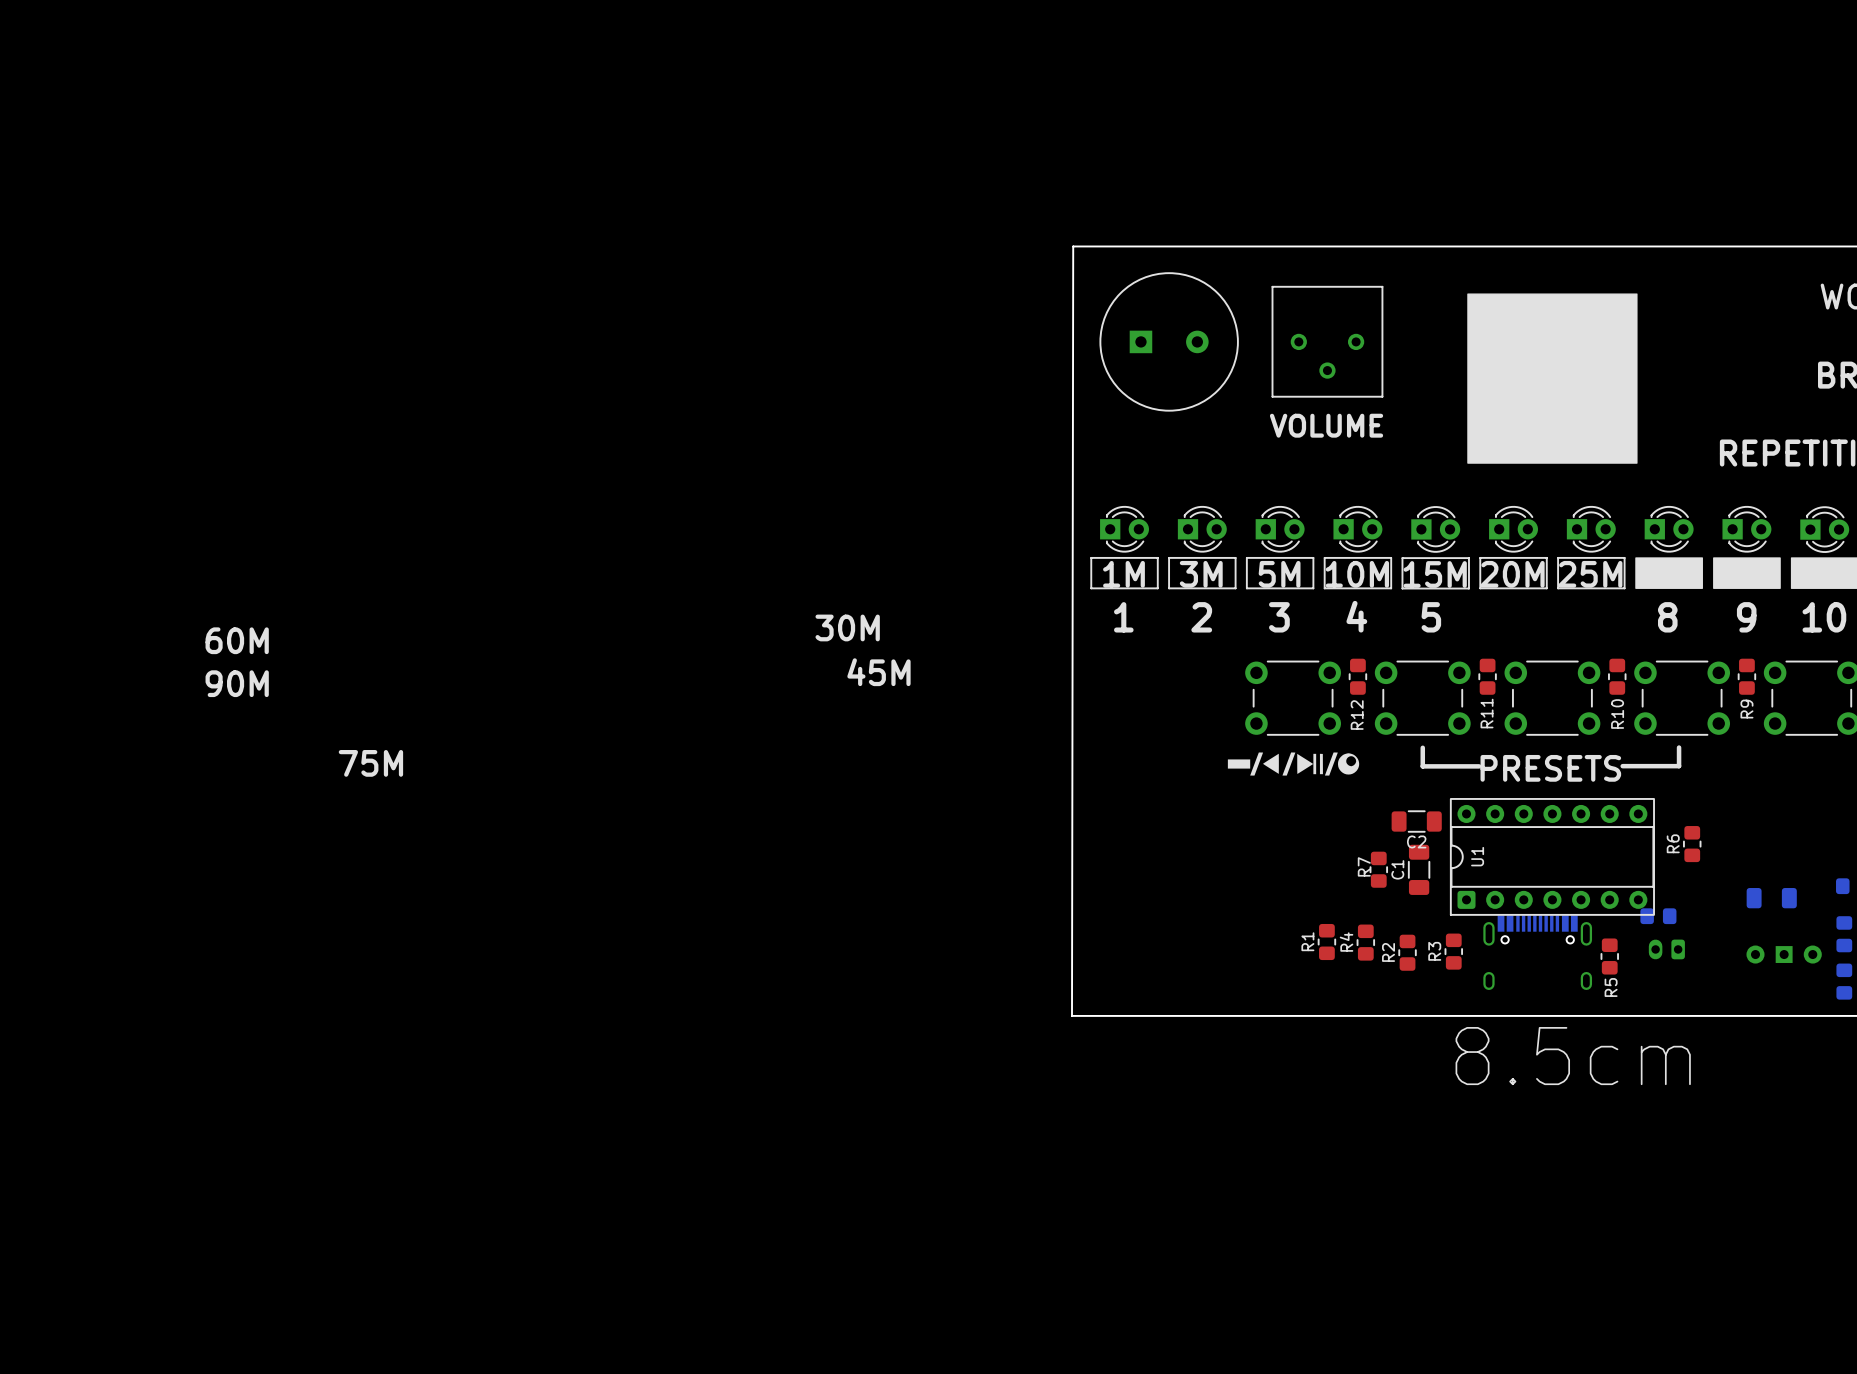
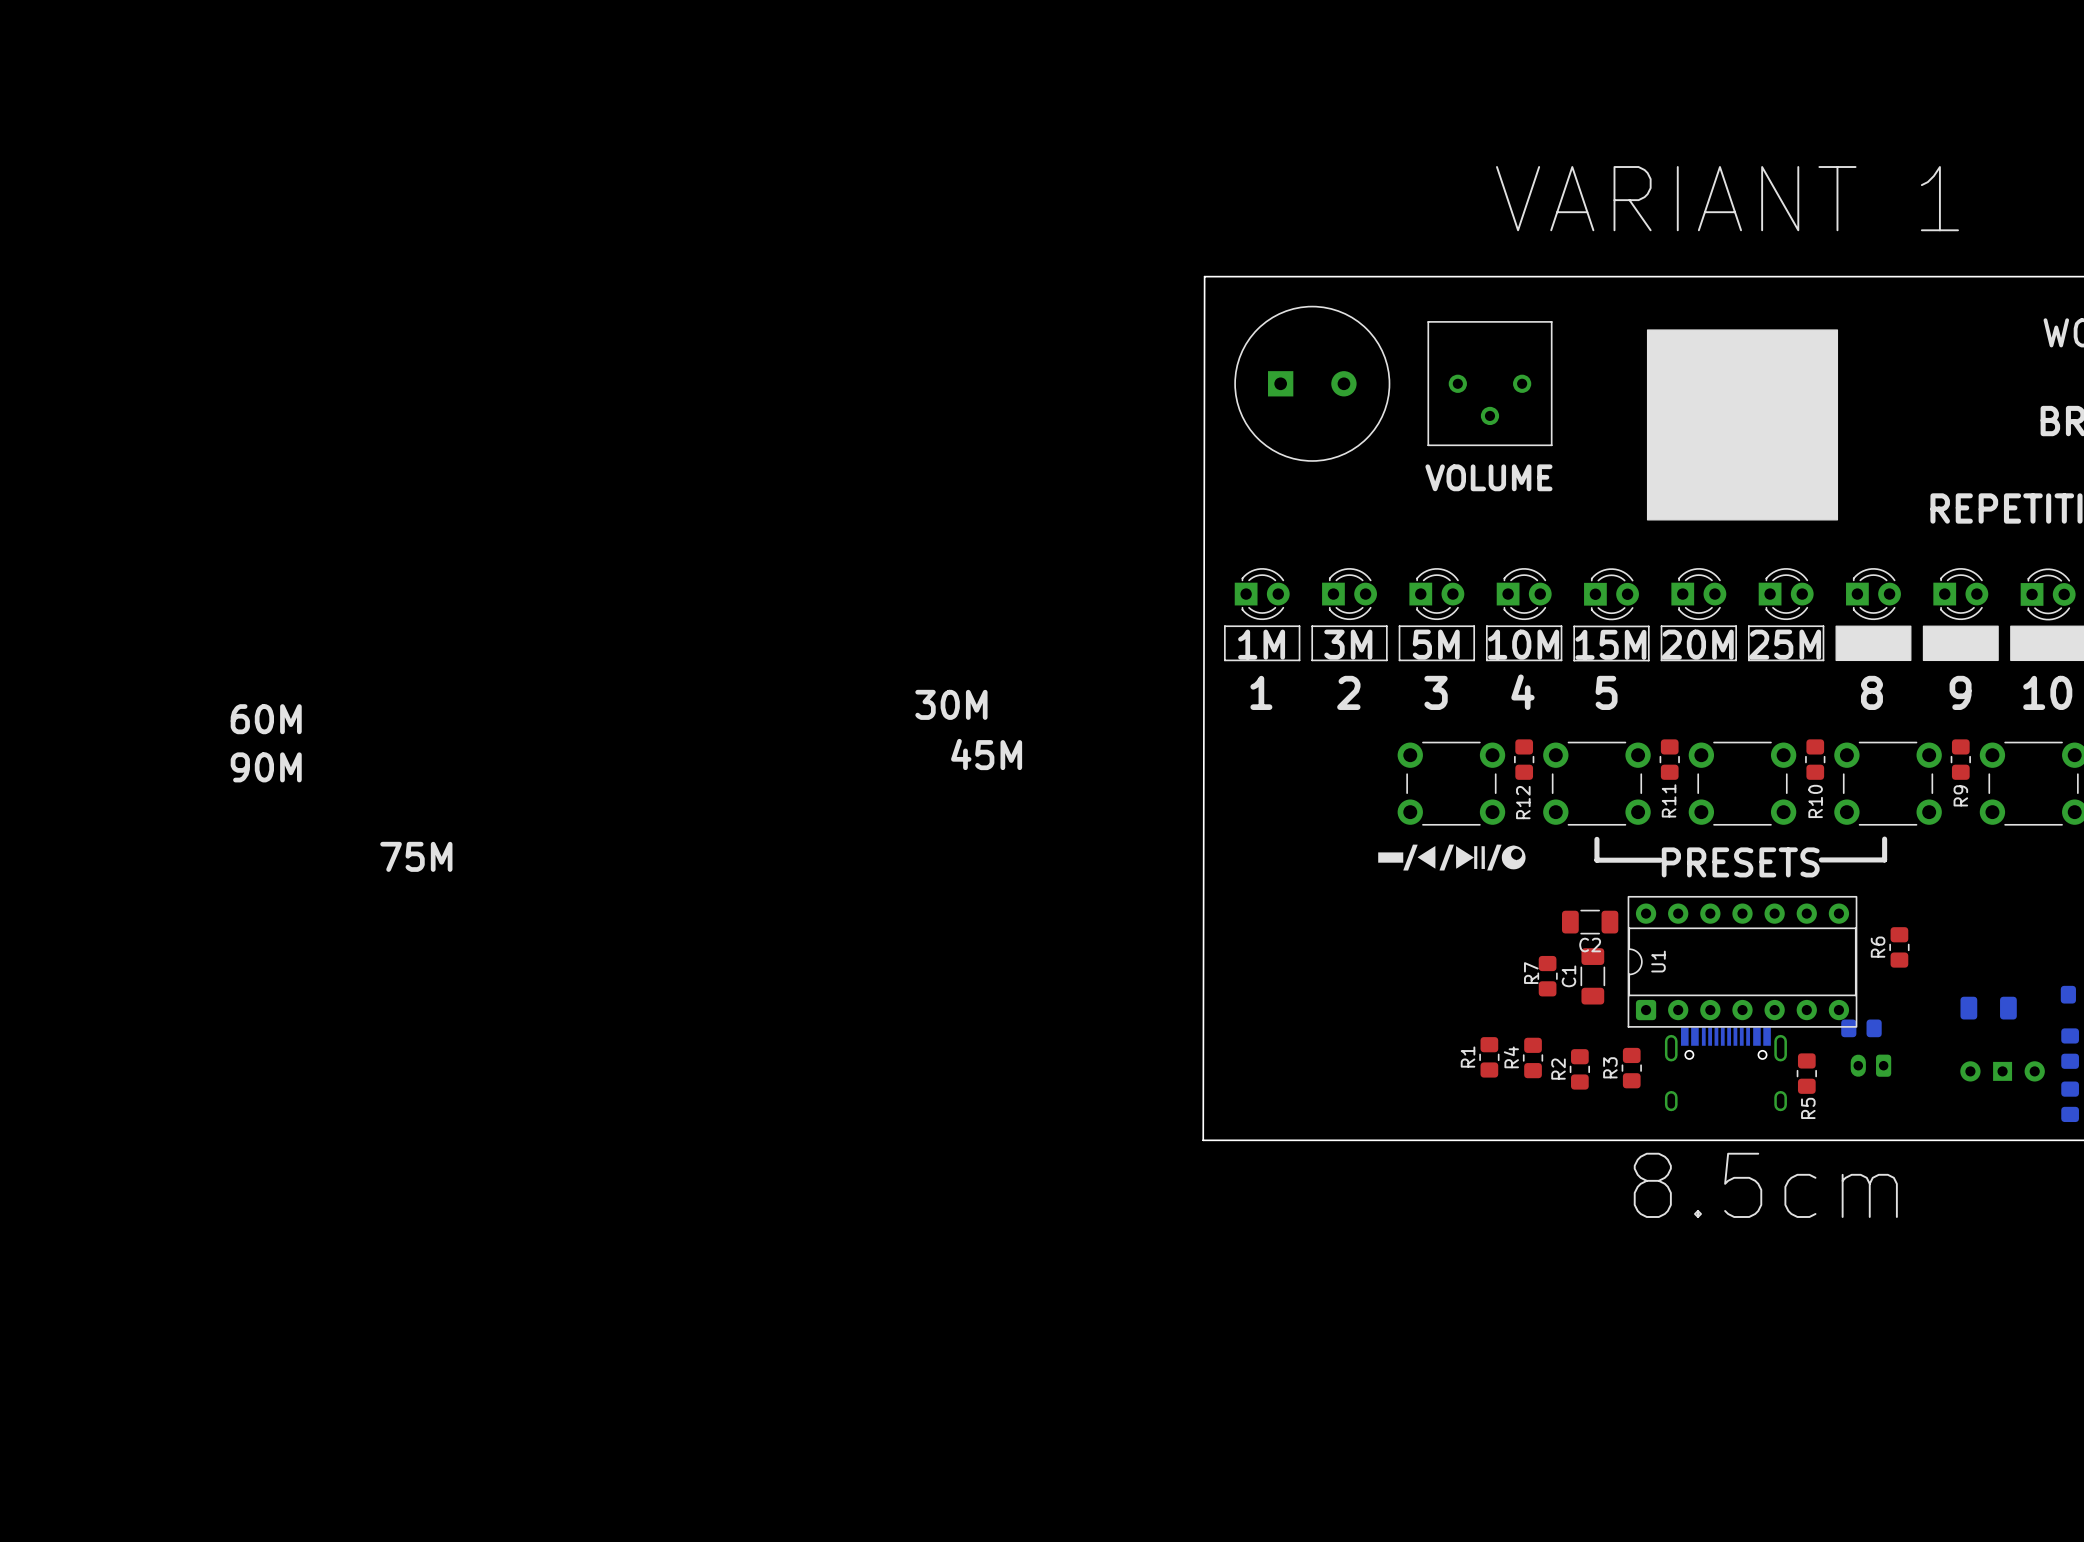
text: none -> VARIANT 1 (1727, 198)

